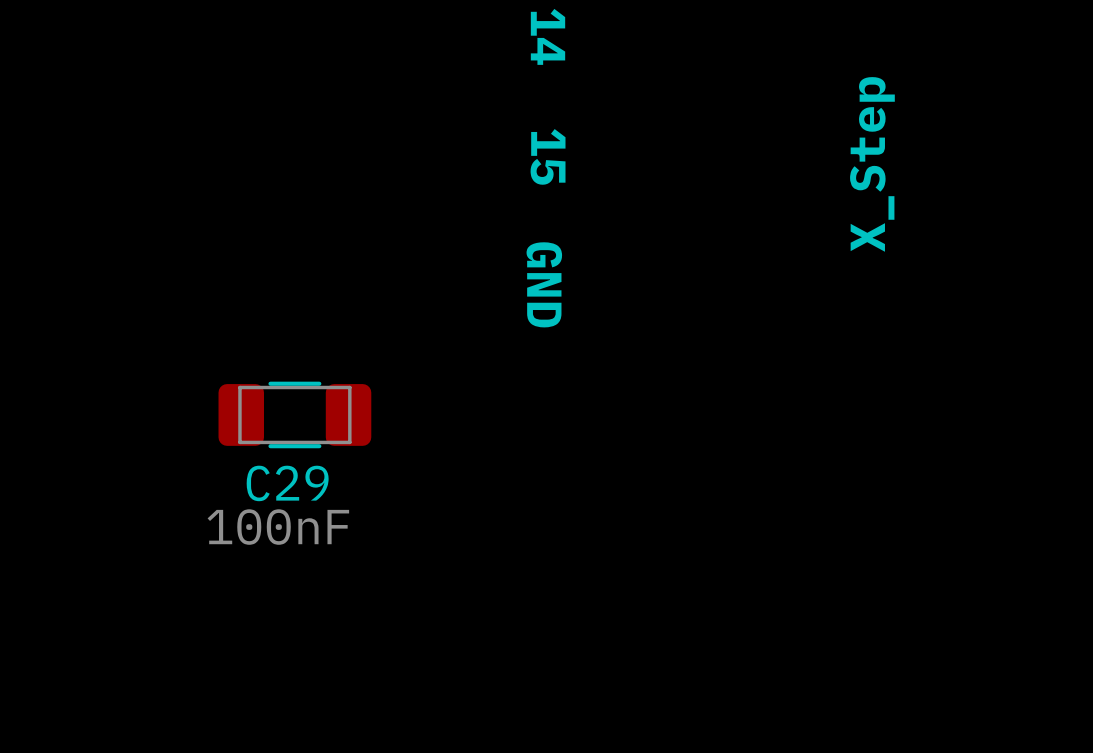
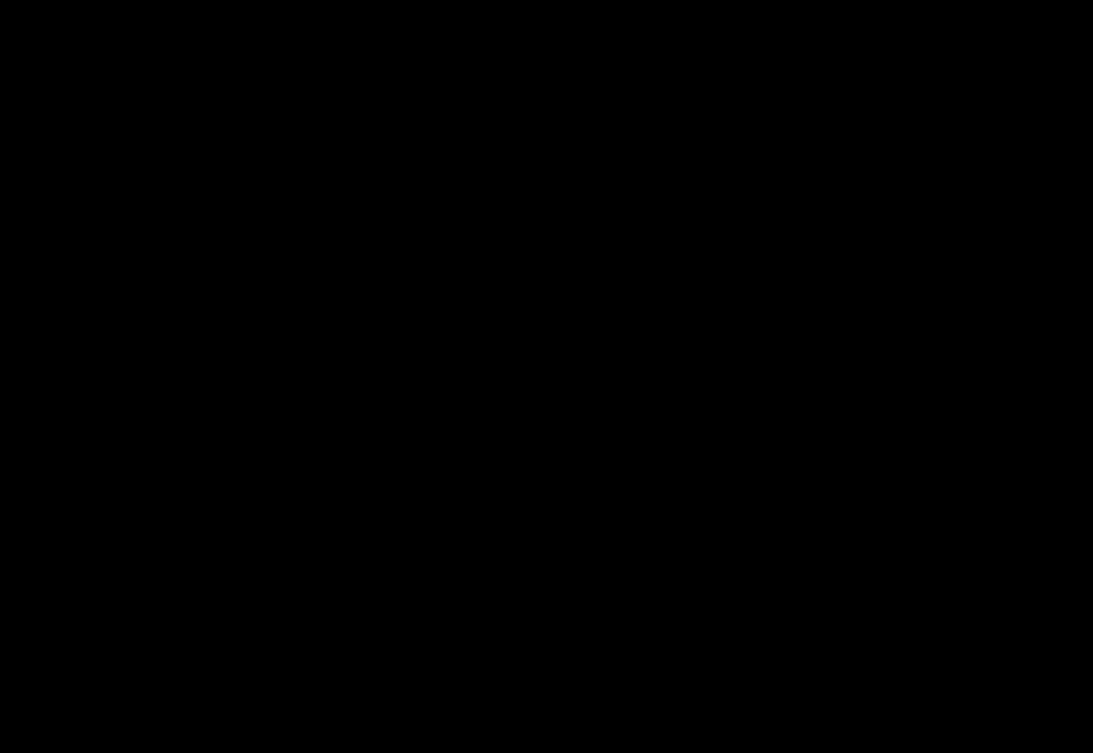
text: 14 (548, 36) -> none
text: 15 (548, 156) -> none
text: X_Step (872, 164) -> none
text: GND (544, 284) -> none
C29: 100nF (294, 414) -> none

